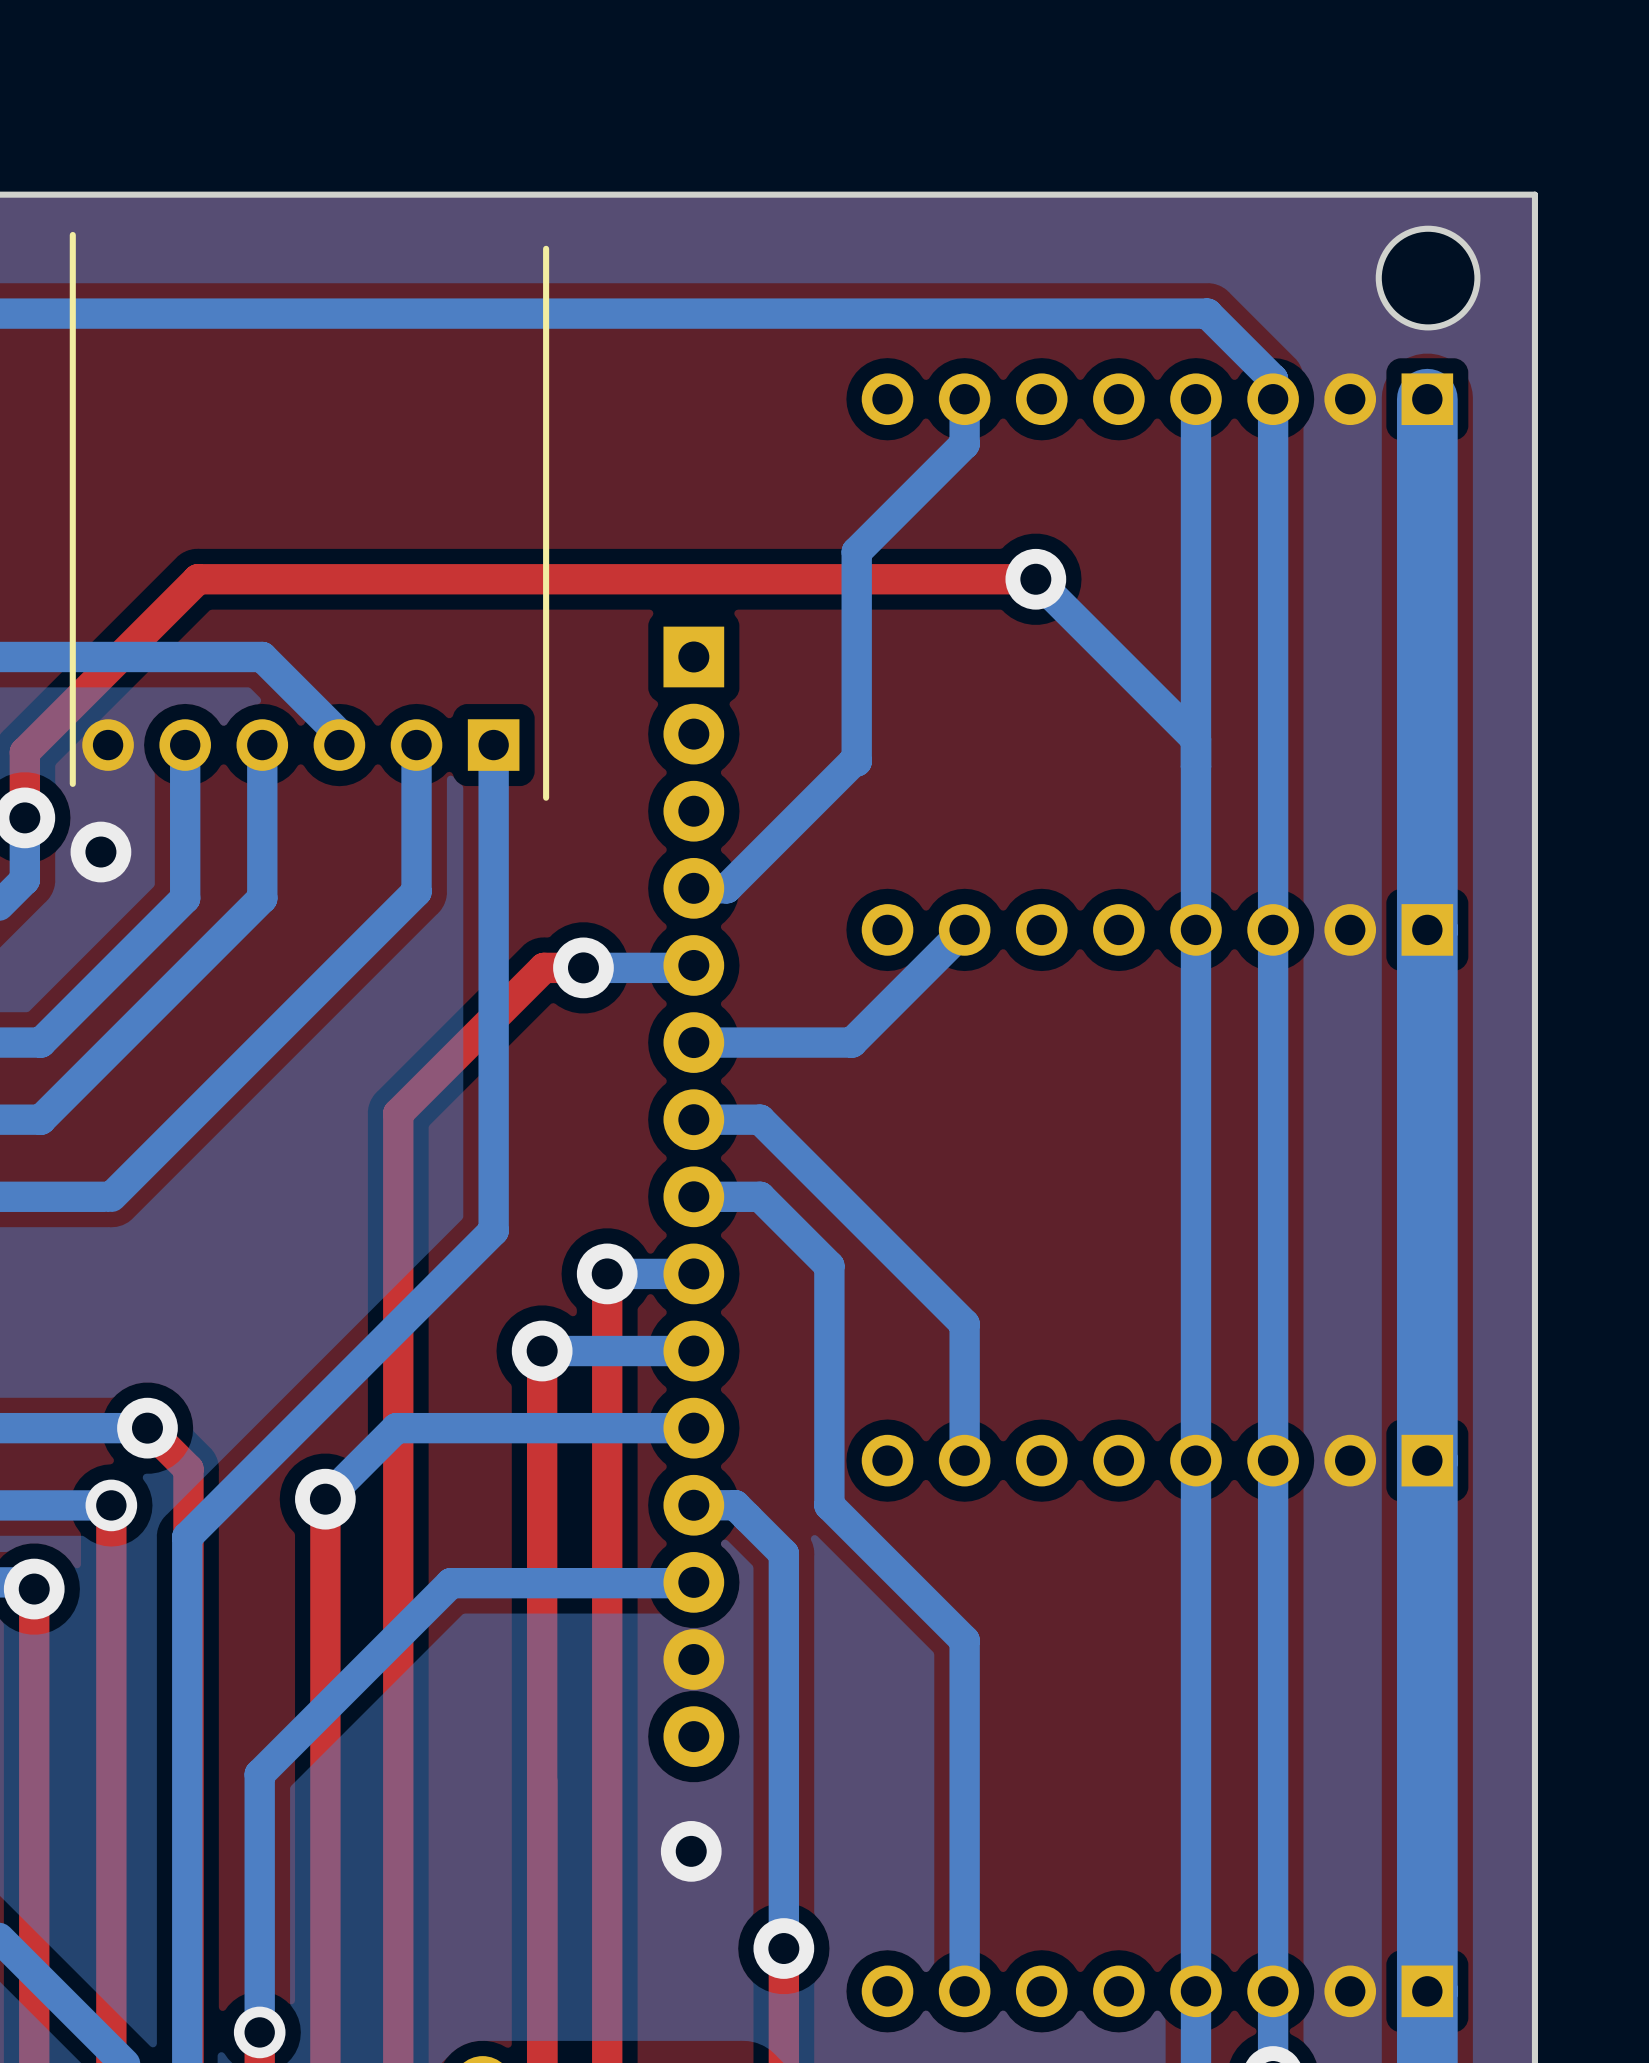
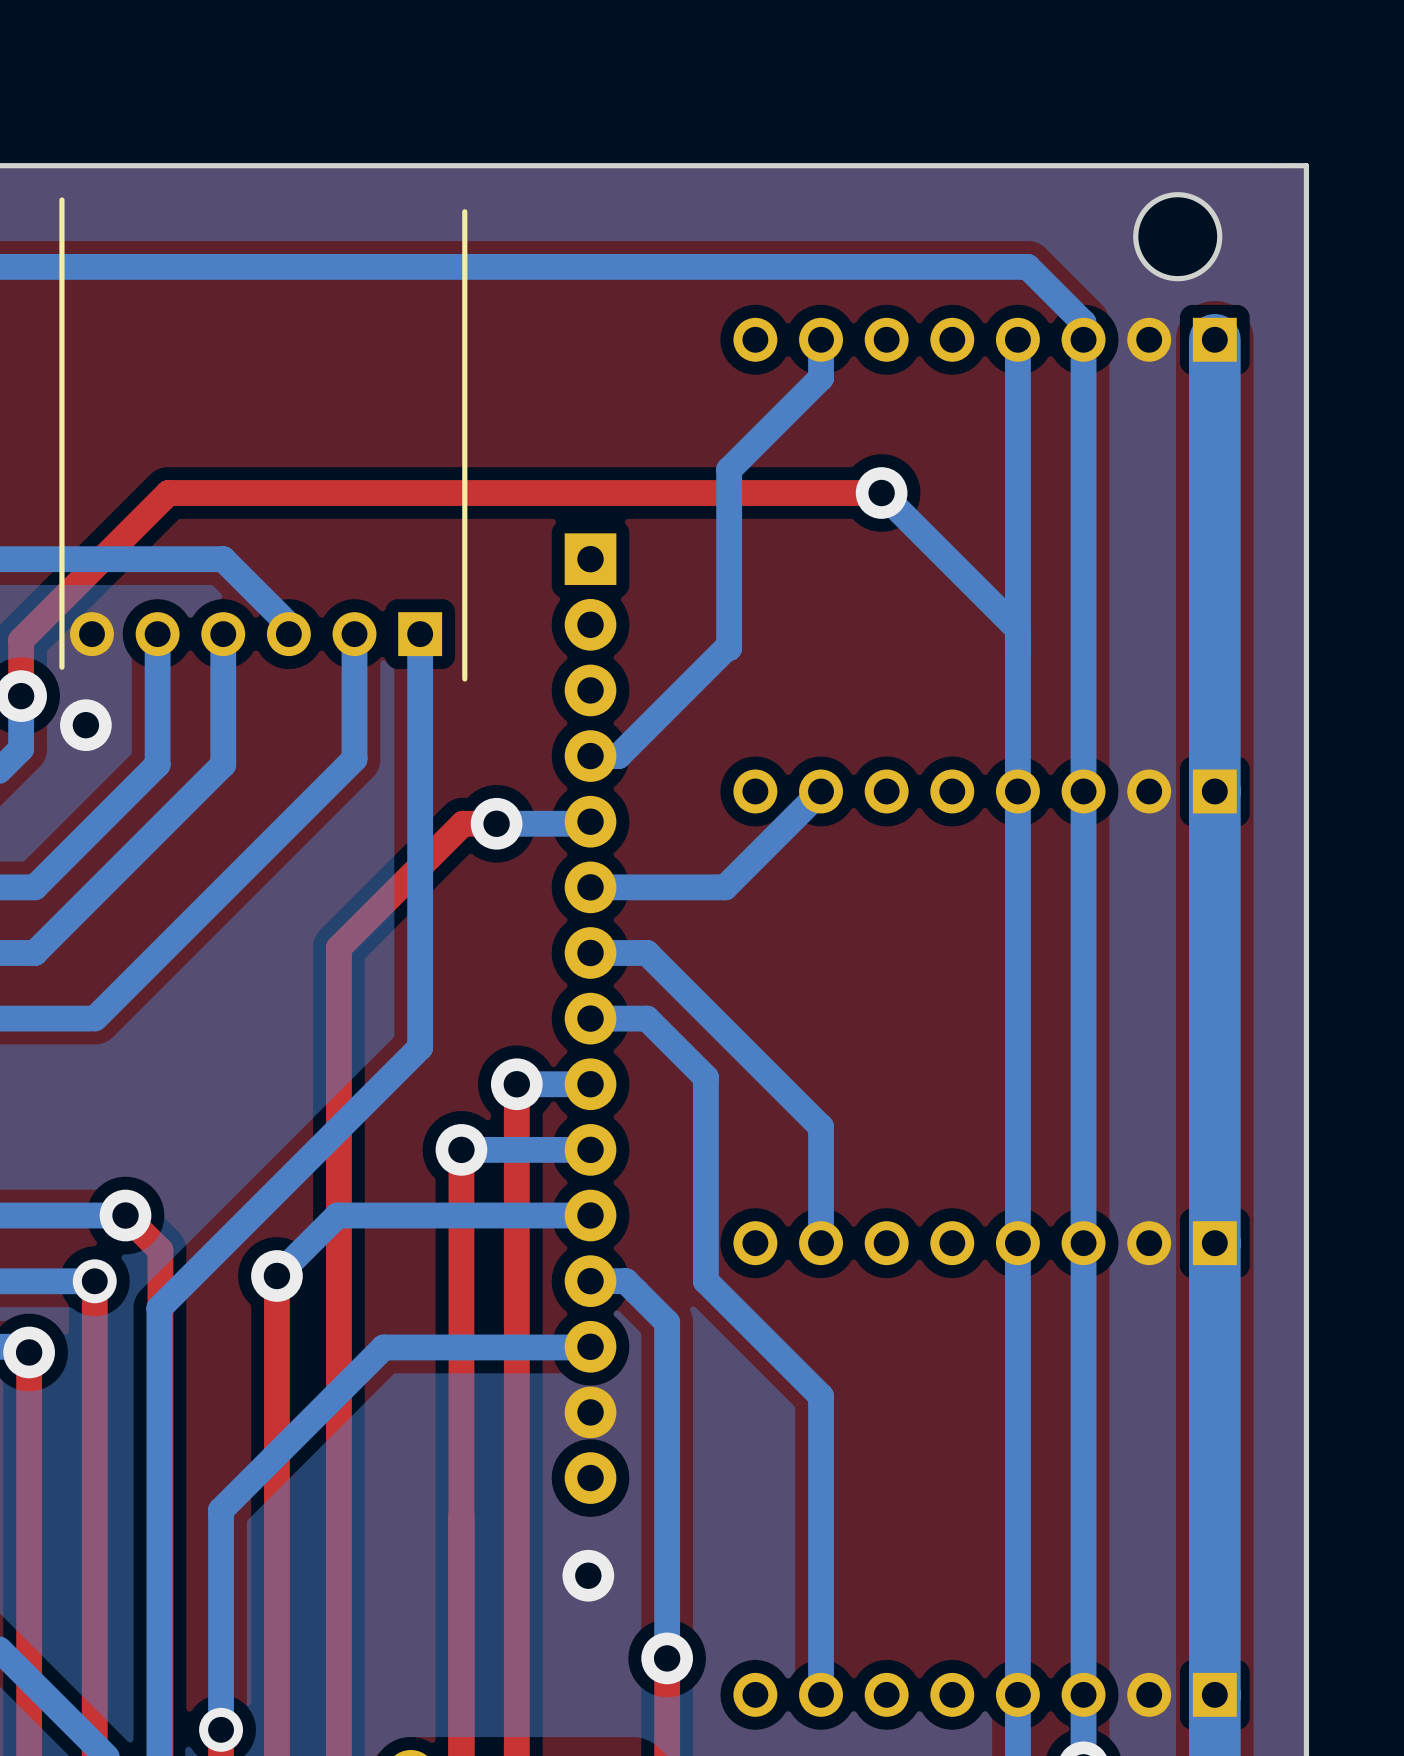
round board edge position: (1428, 278) -> (1177, 236)

